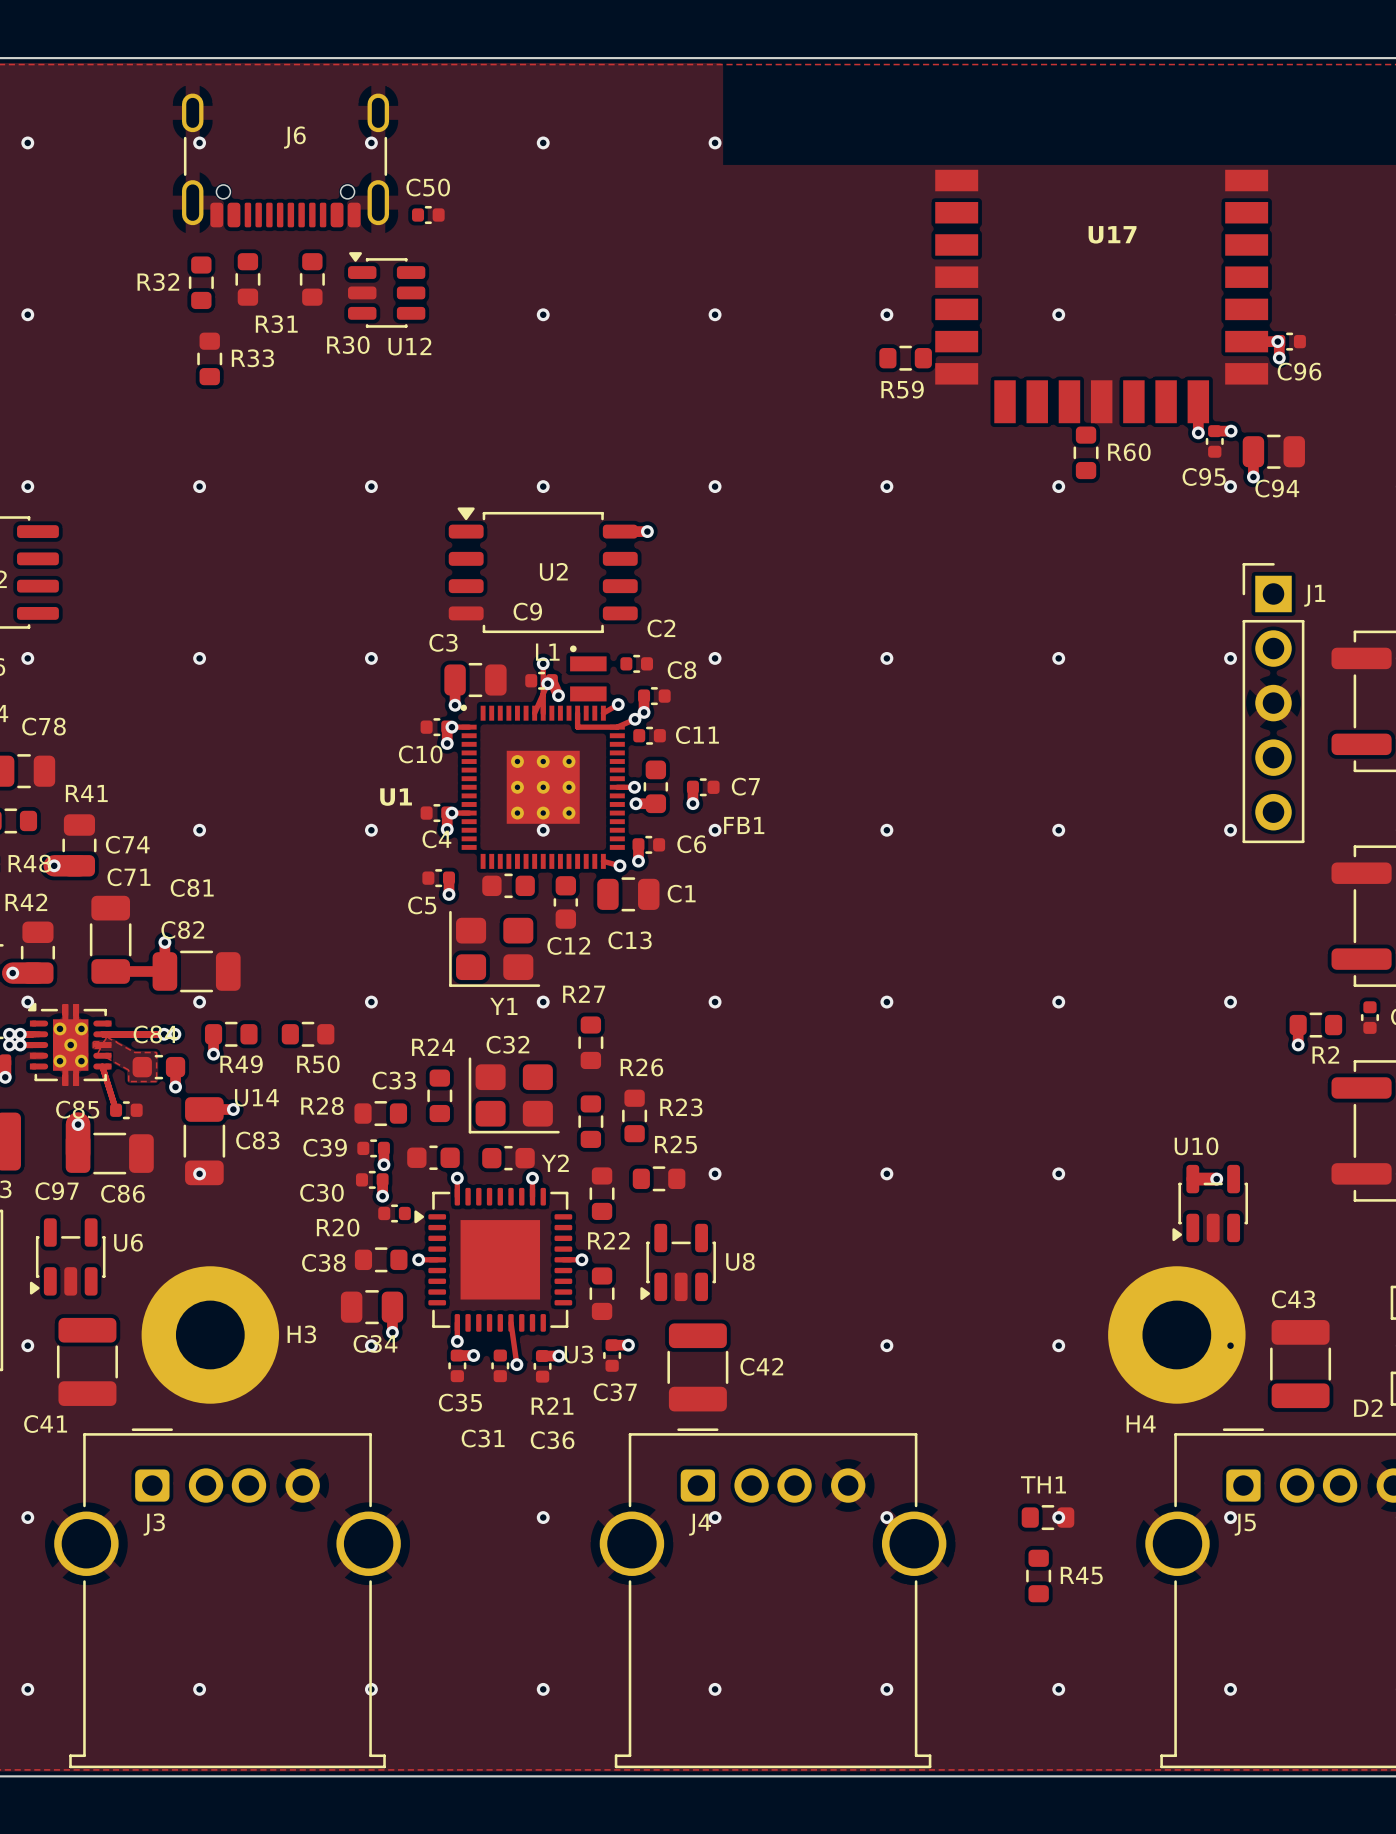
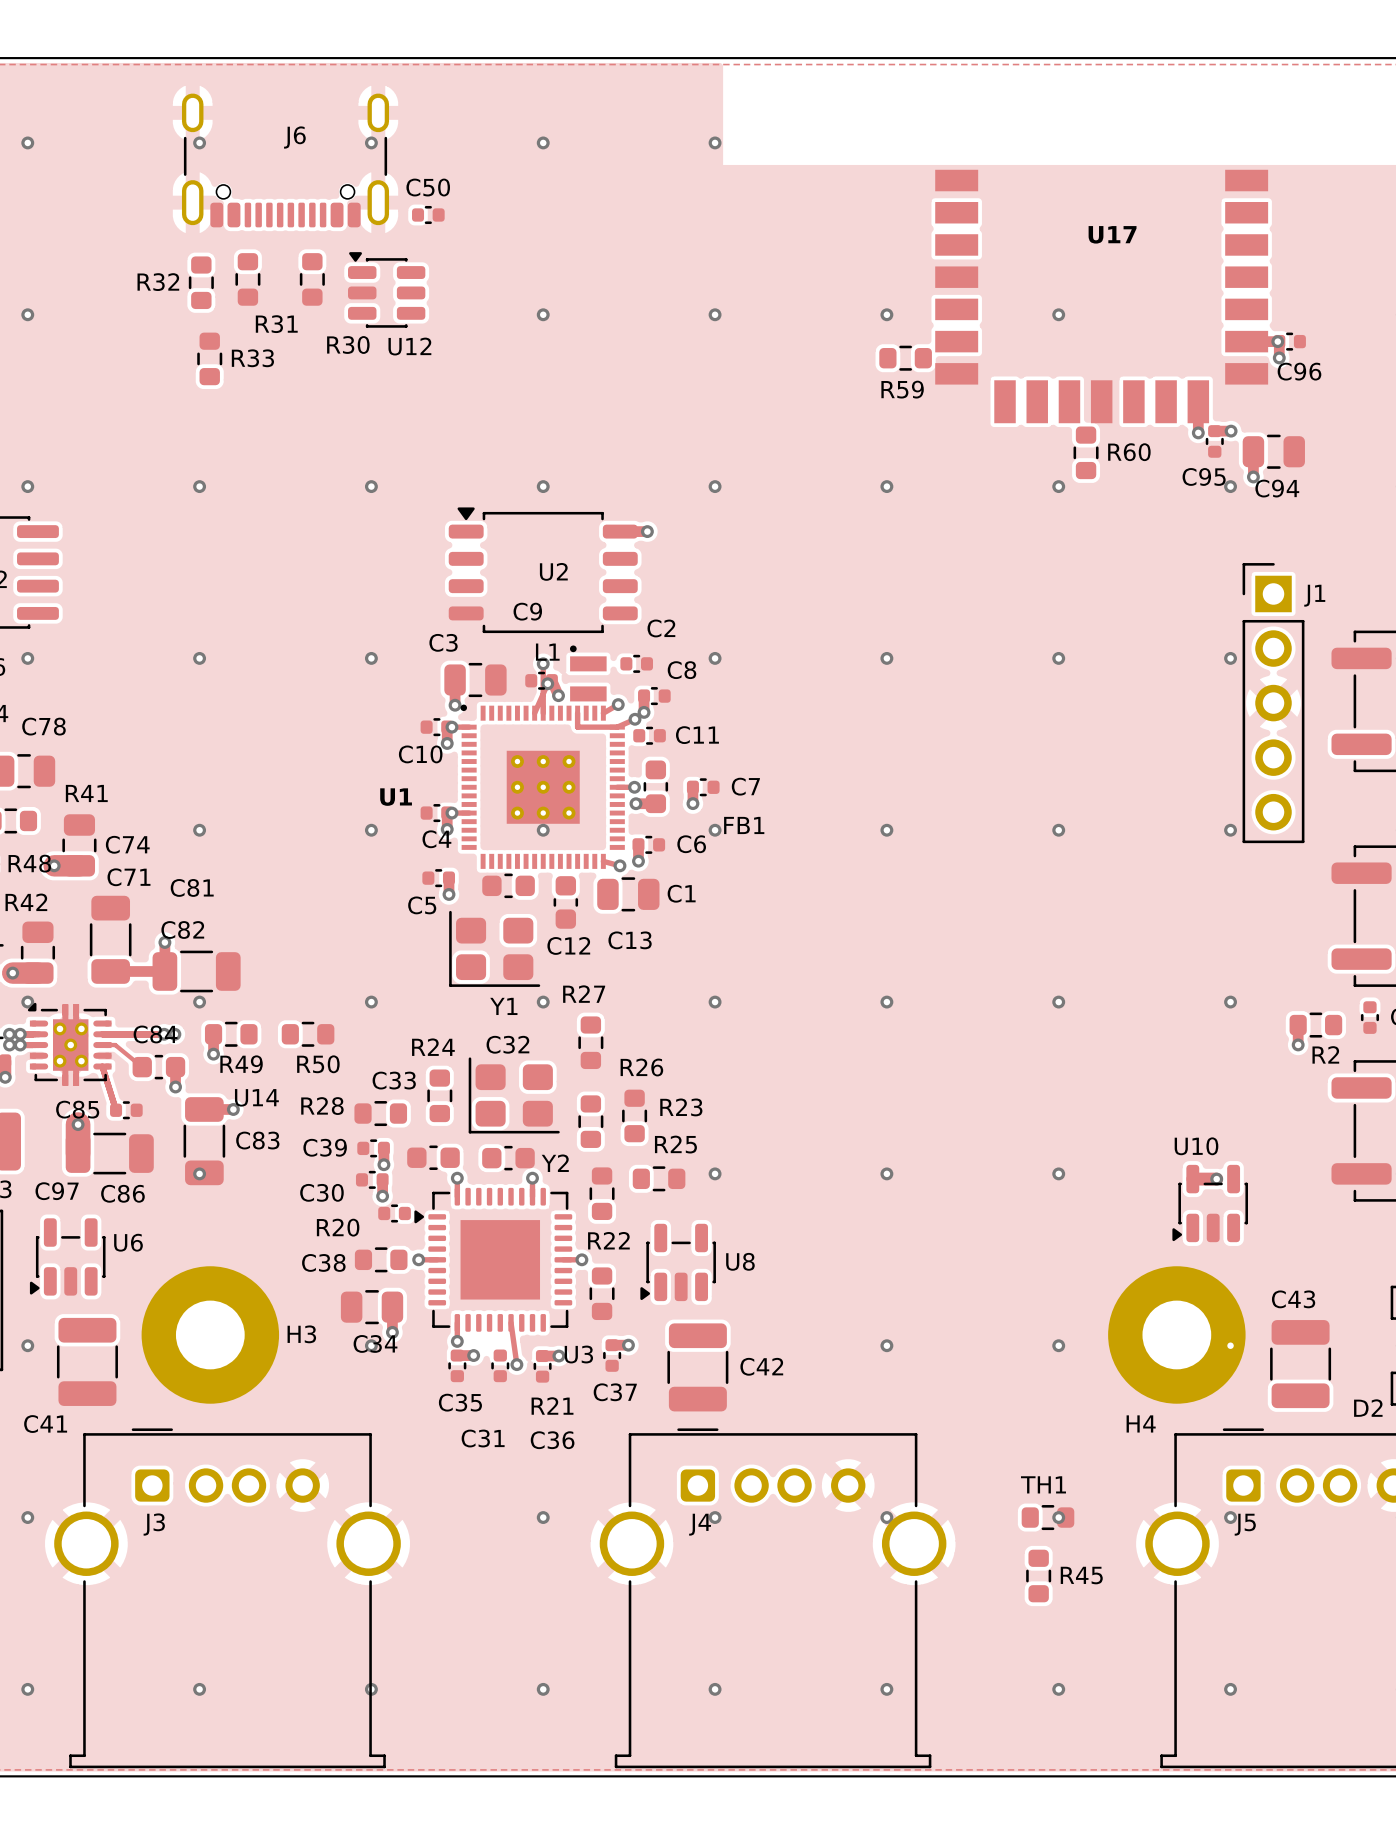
zone outline: (106, 1037) (134, 1052) (156, 1052) (156, 1081) (128, 1081) (128, 1070) (97, 1053) (100, 1048) (93, 1048) (93, 1041) (104, 1041) (106, 1037) -> none
track: none -> (102, 1045) (115, 1045) (142, 1067)

